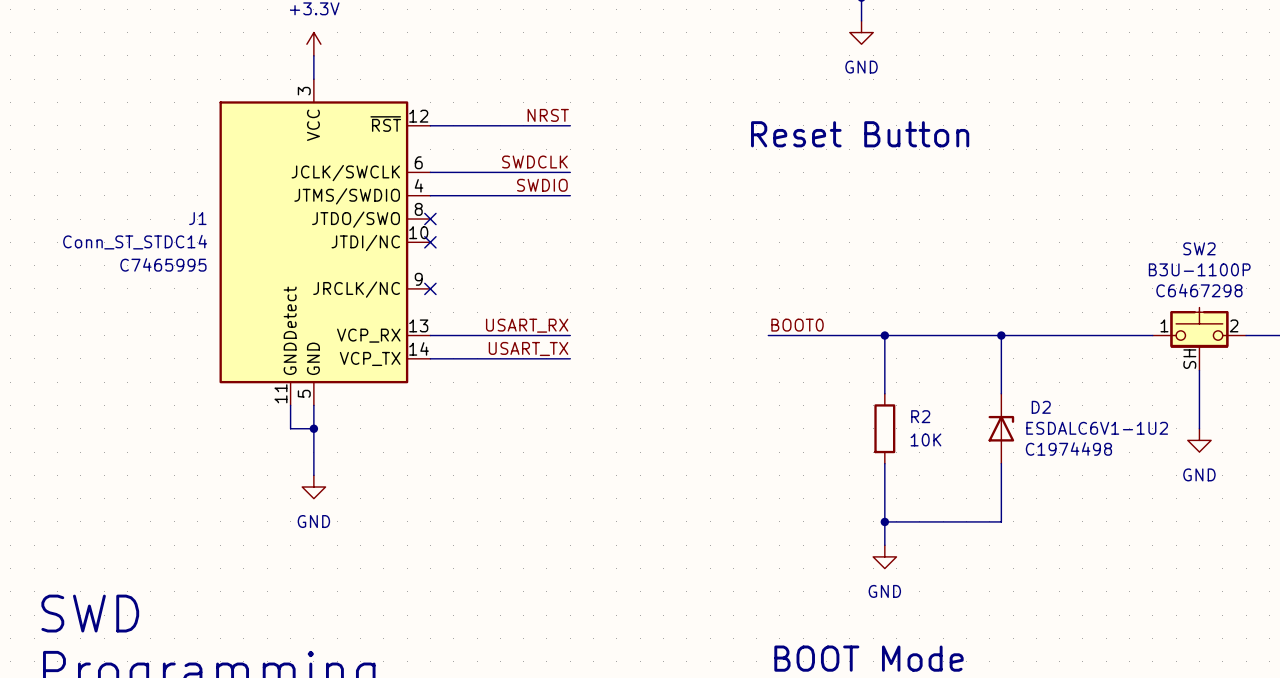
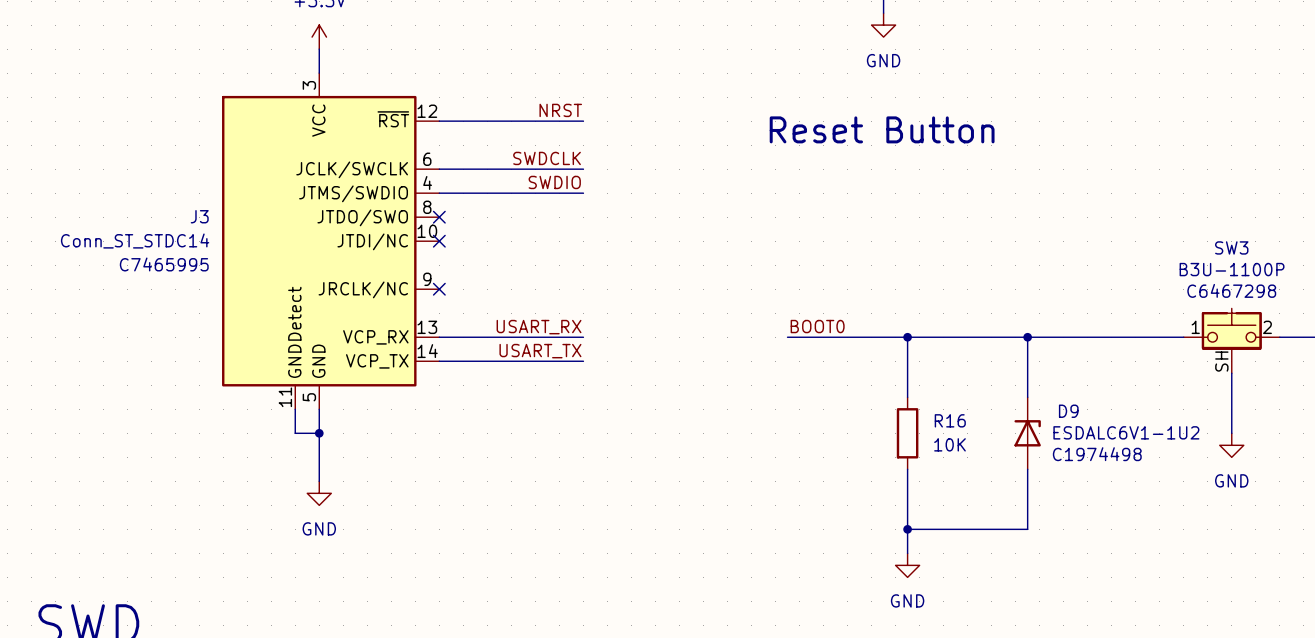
J1 name: J1 (197, 218) -> J3 (199, 216)
SW2 name: SW2 (1199, 248) -> SW3 (1231, 247)
D2 name: D2 (1041, 407) -> D9 (1068, 411)
R2 name: R2 (920, 416) -> R16 (950, 420)

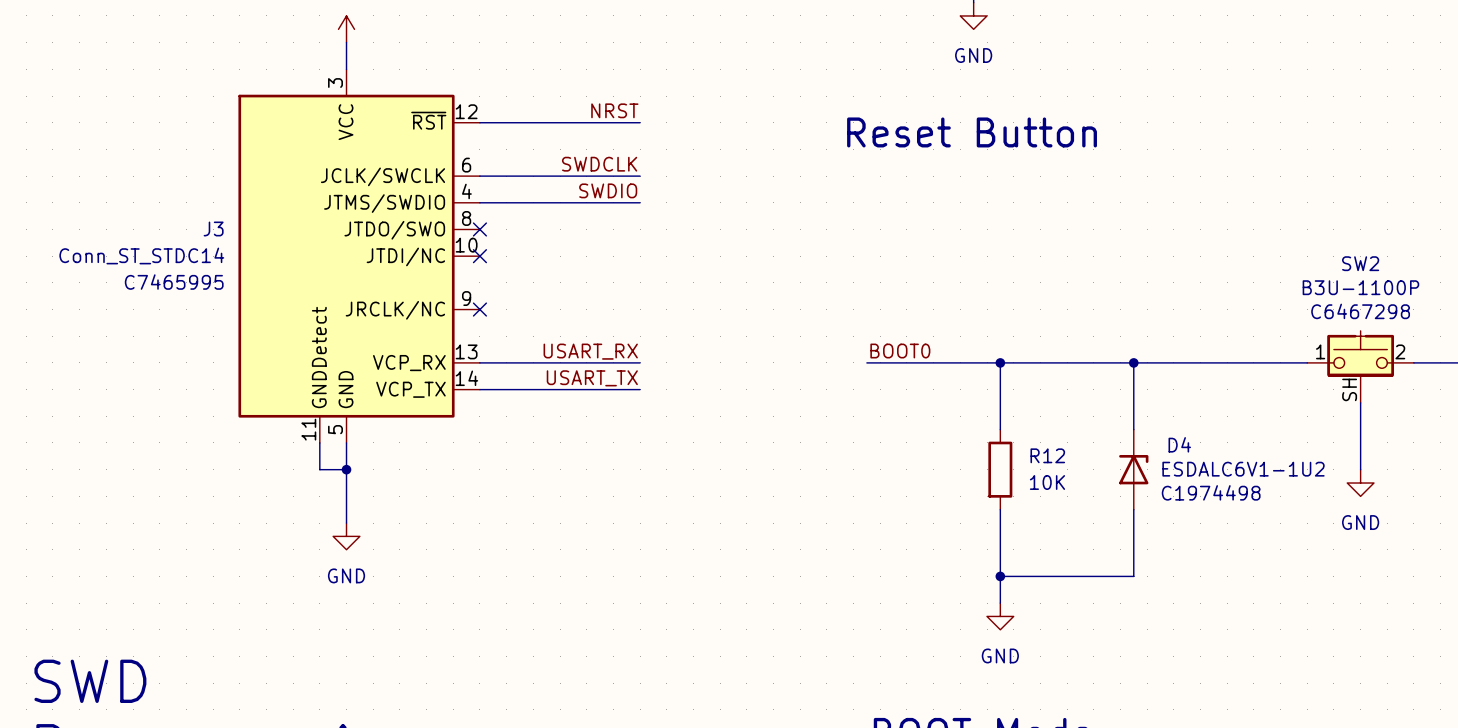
SW3 name: SW3 (1231, 247) -> SW2 (1360, 263)
D9 name: D9 (1068, 411) -> D4 (1179, 444)
R16 name: R16 (950, 420) -> R12 (1047, 455)

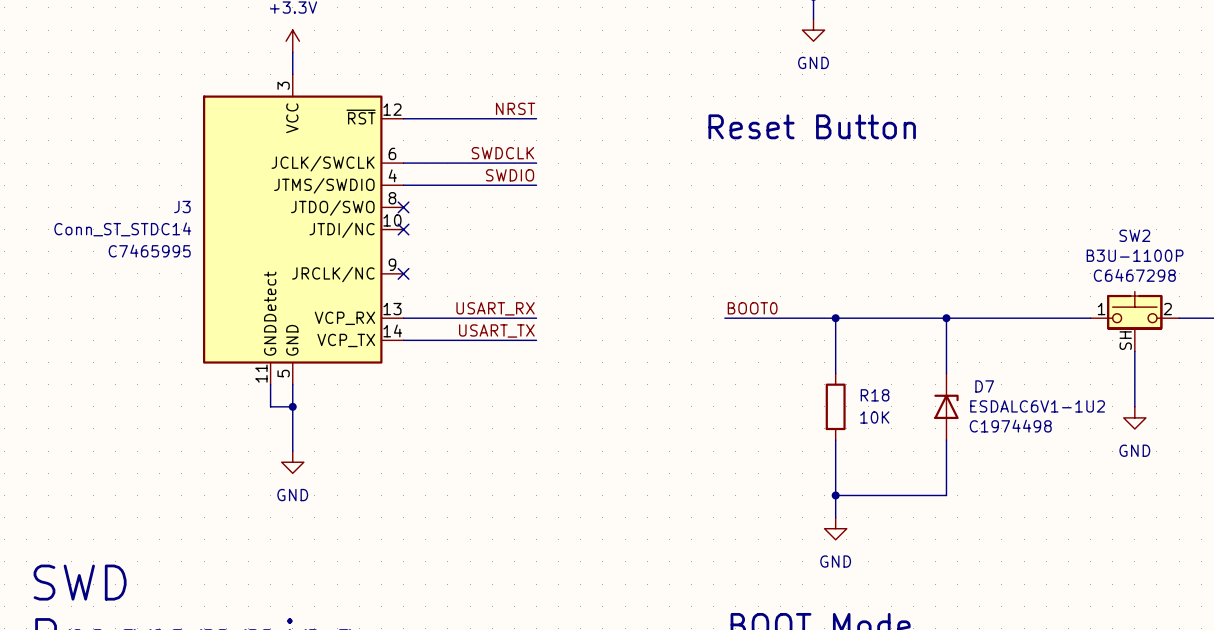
D4 name: D4 (1179, 444) -> D7 (984, 386)
R12 name: R12 (1047, 455) -> R18 (875, 395)

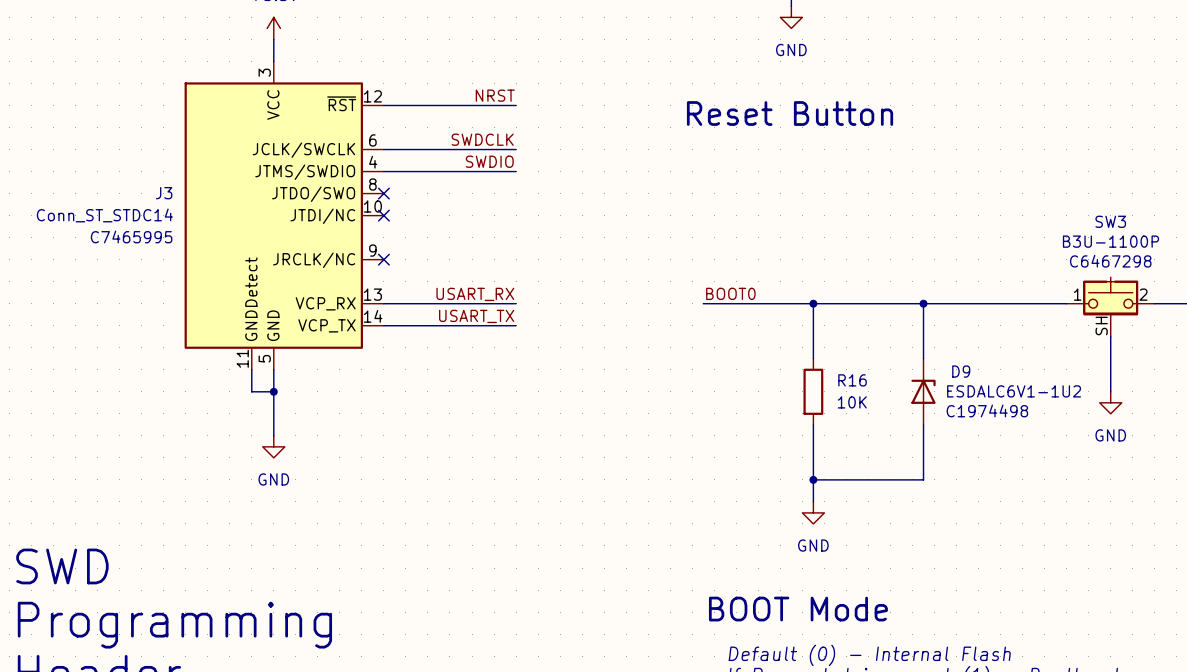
SW2 name: SW2 (1134, 235) -> SW3 (1110, 221)
D7 name: D7 (984, 386) -> D9 (961, 371)
R18 name: R18 (875, 395) -> R16 (852, 380)

